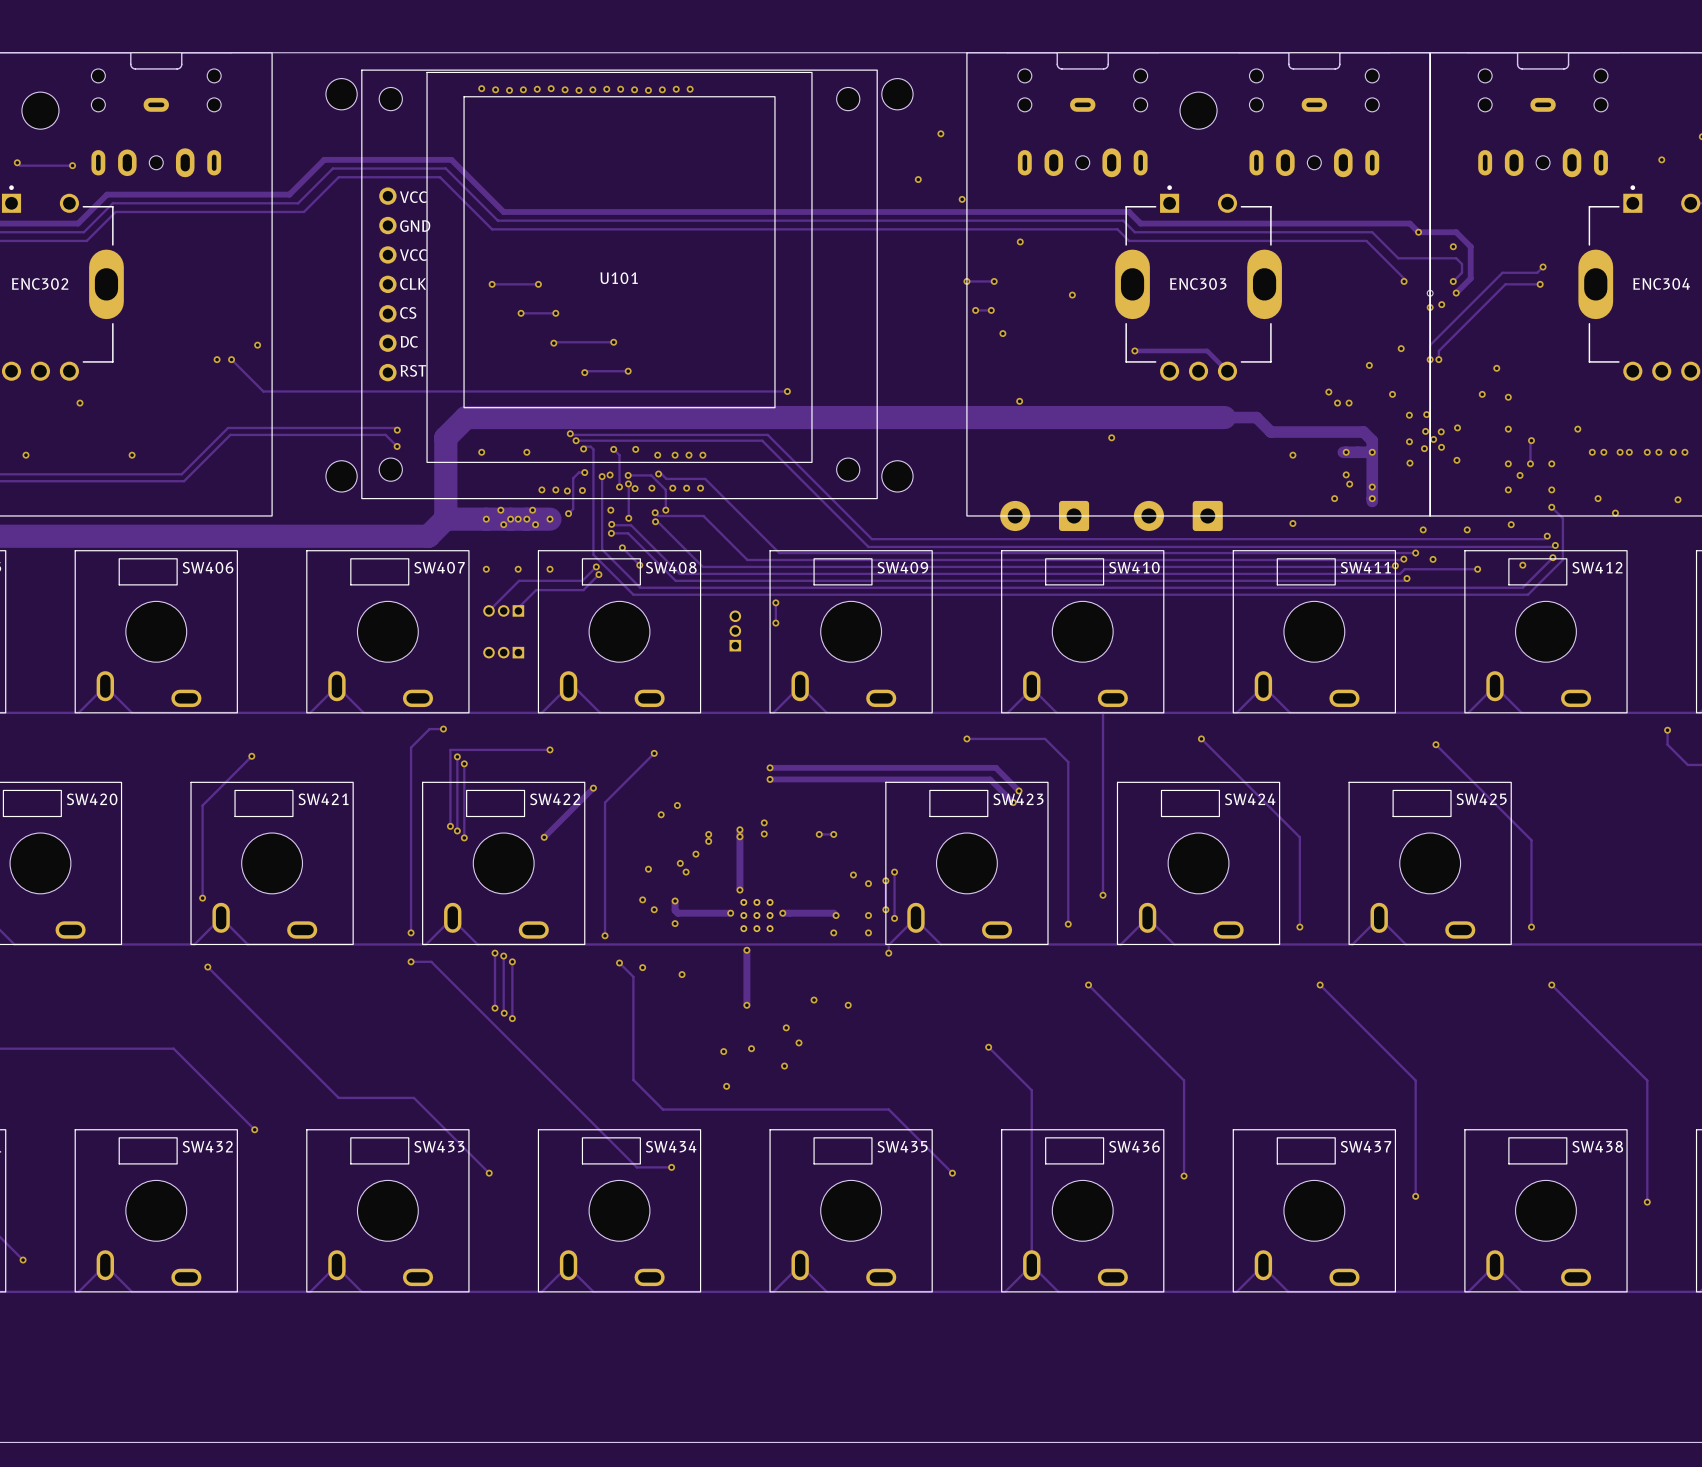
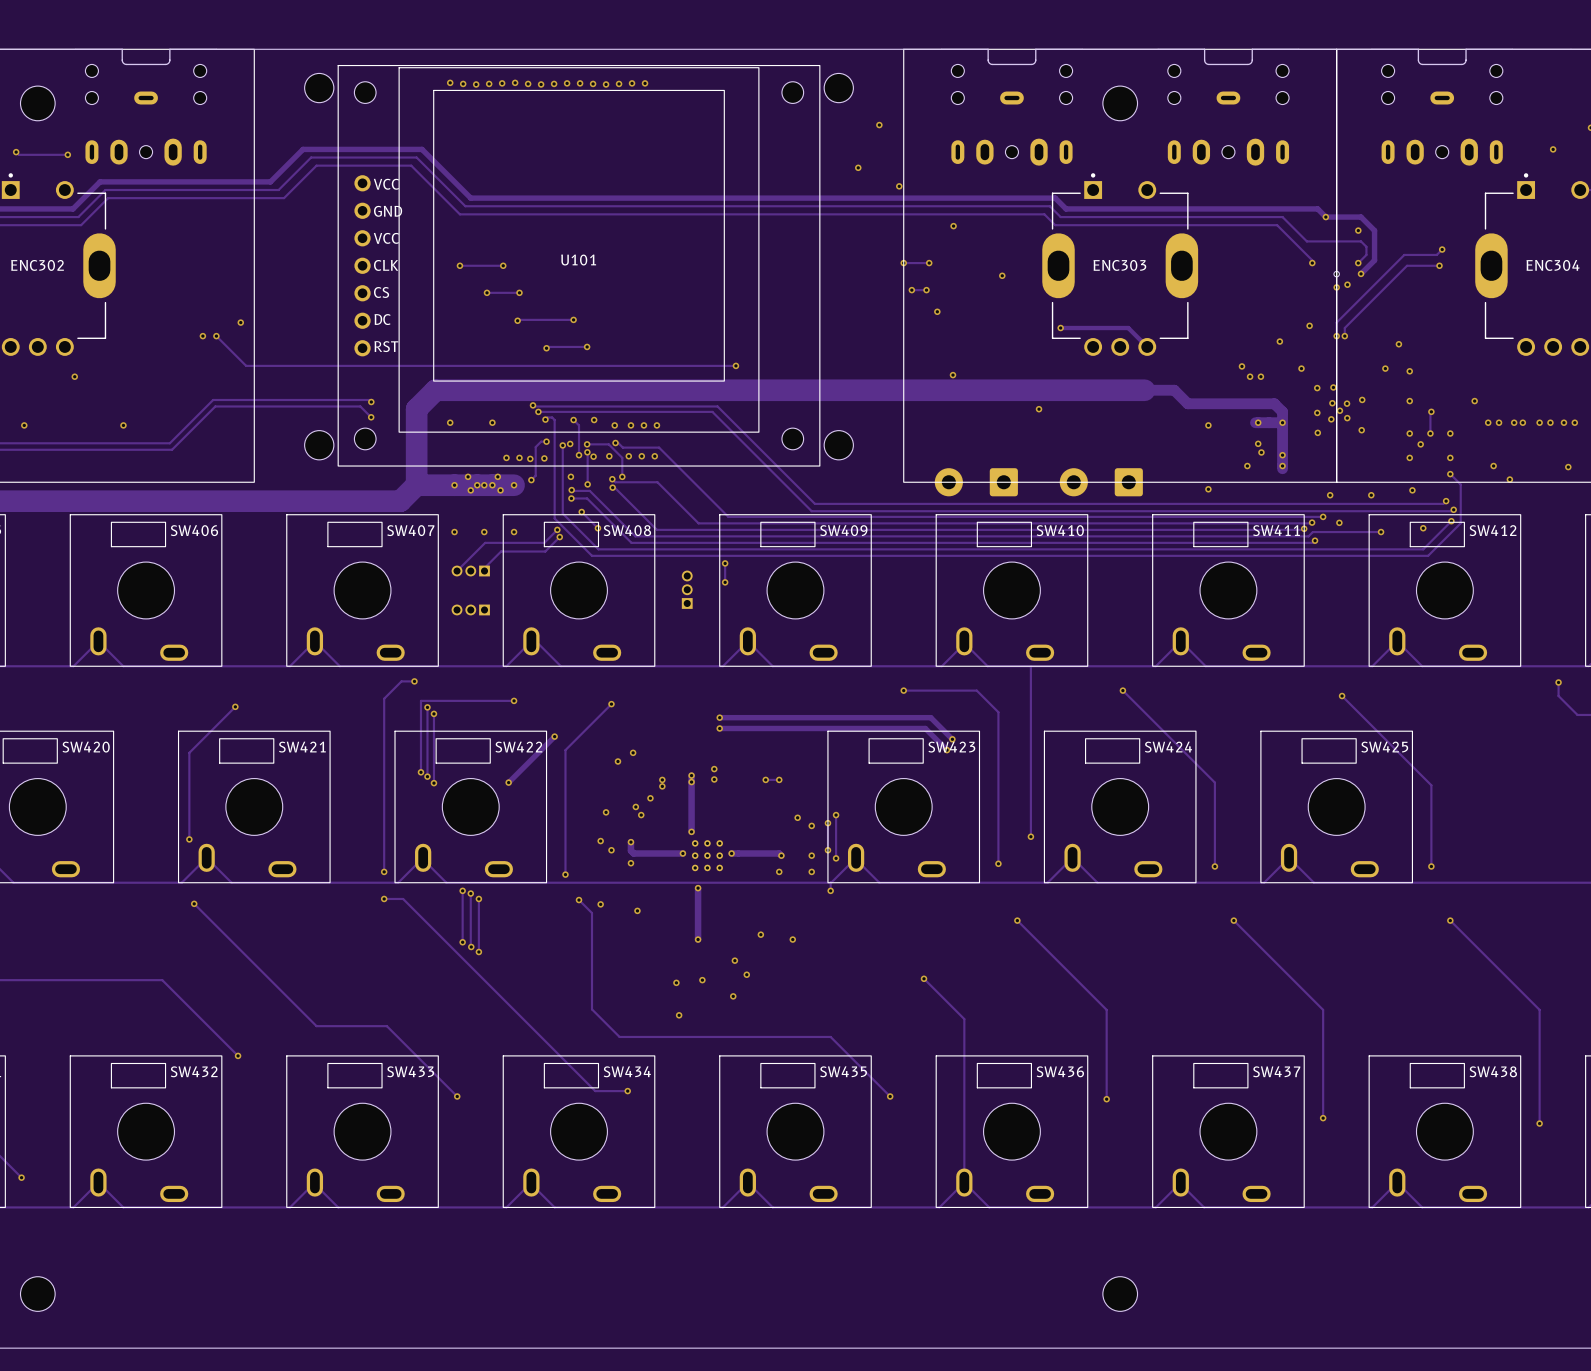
part: none -> (37, 1294)
part: none -> (1120, 1294)

